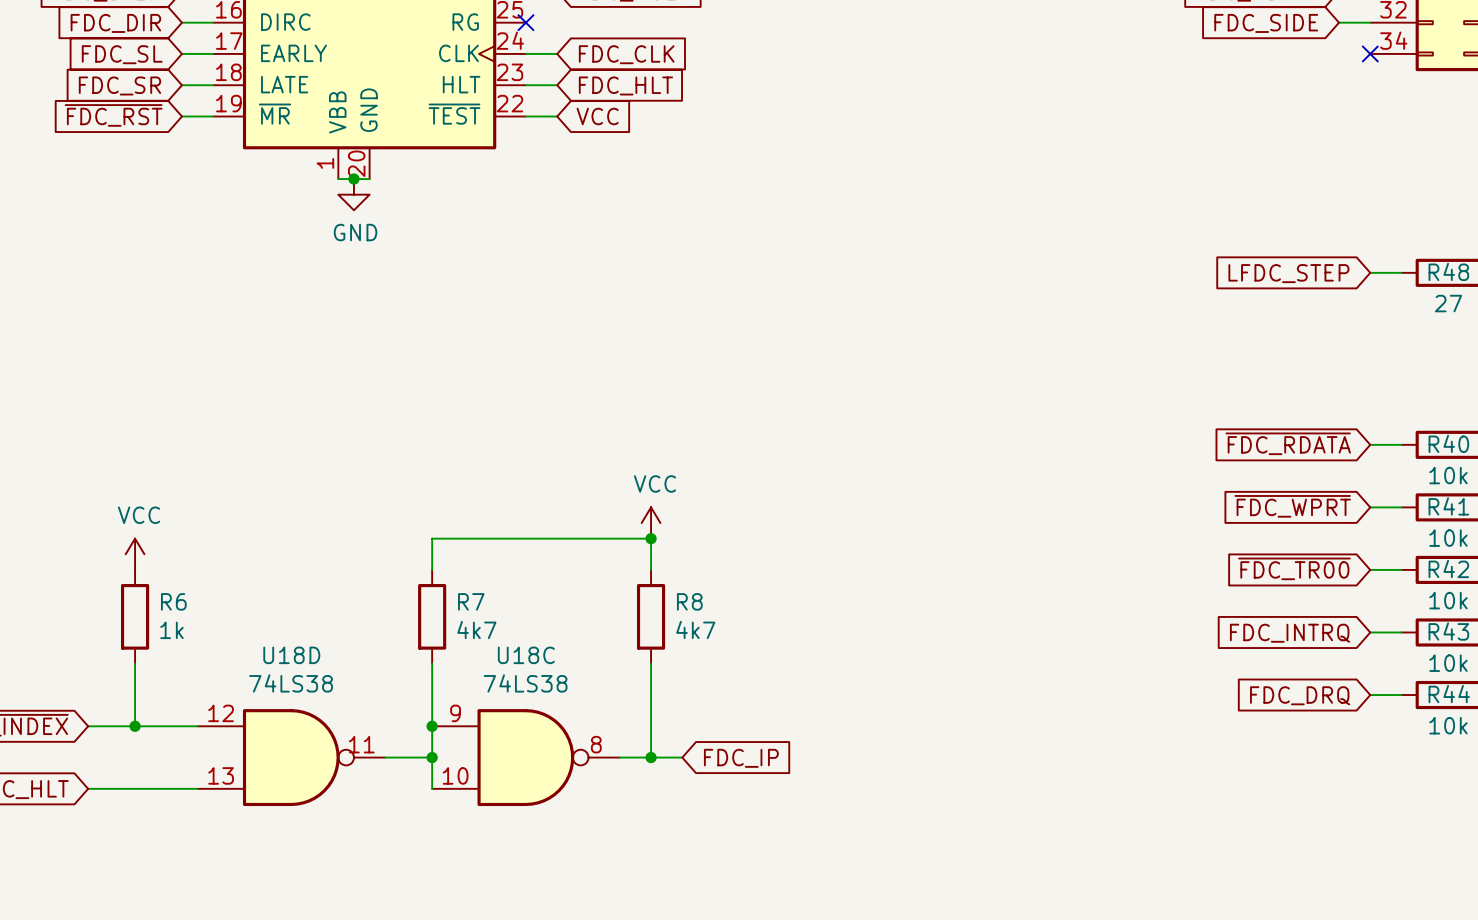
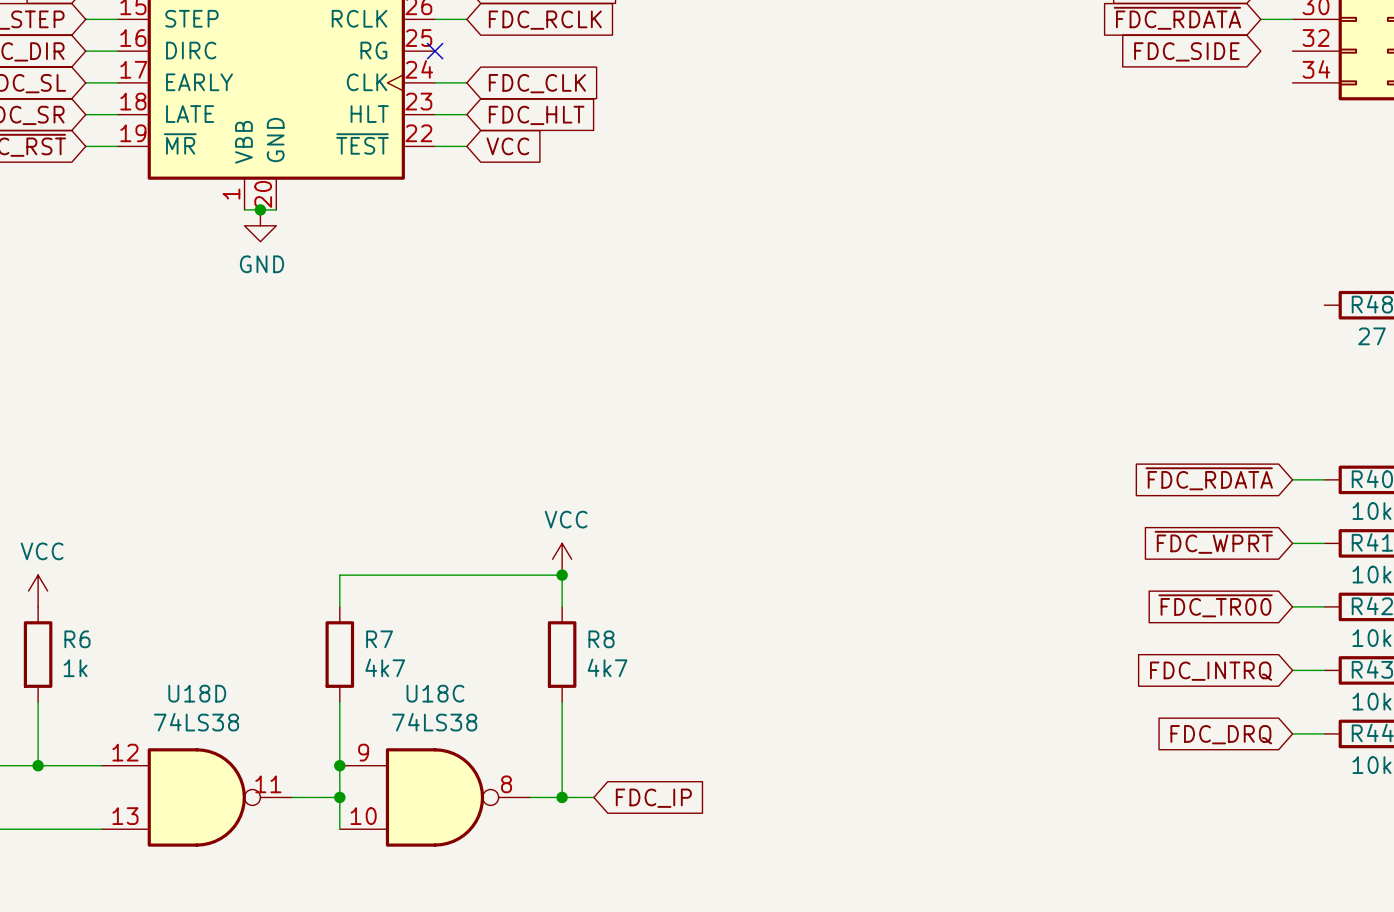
wire: (1339, 22) (1370, 22) -> none
no-connect mark: (1370, 53) -> none
wire: (1370, 272) (1401, 272) -> none
global label: LFDC_STEP (1288, 273) -> none

